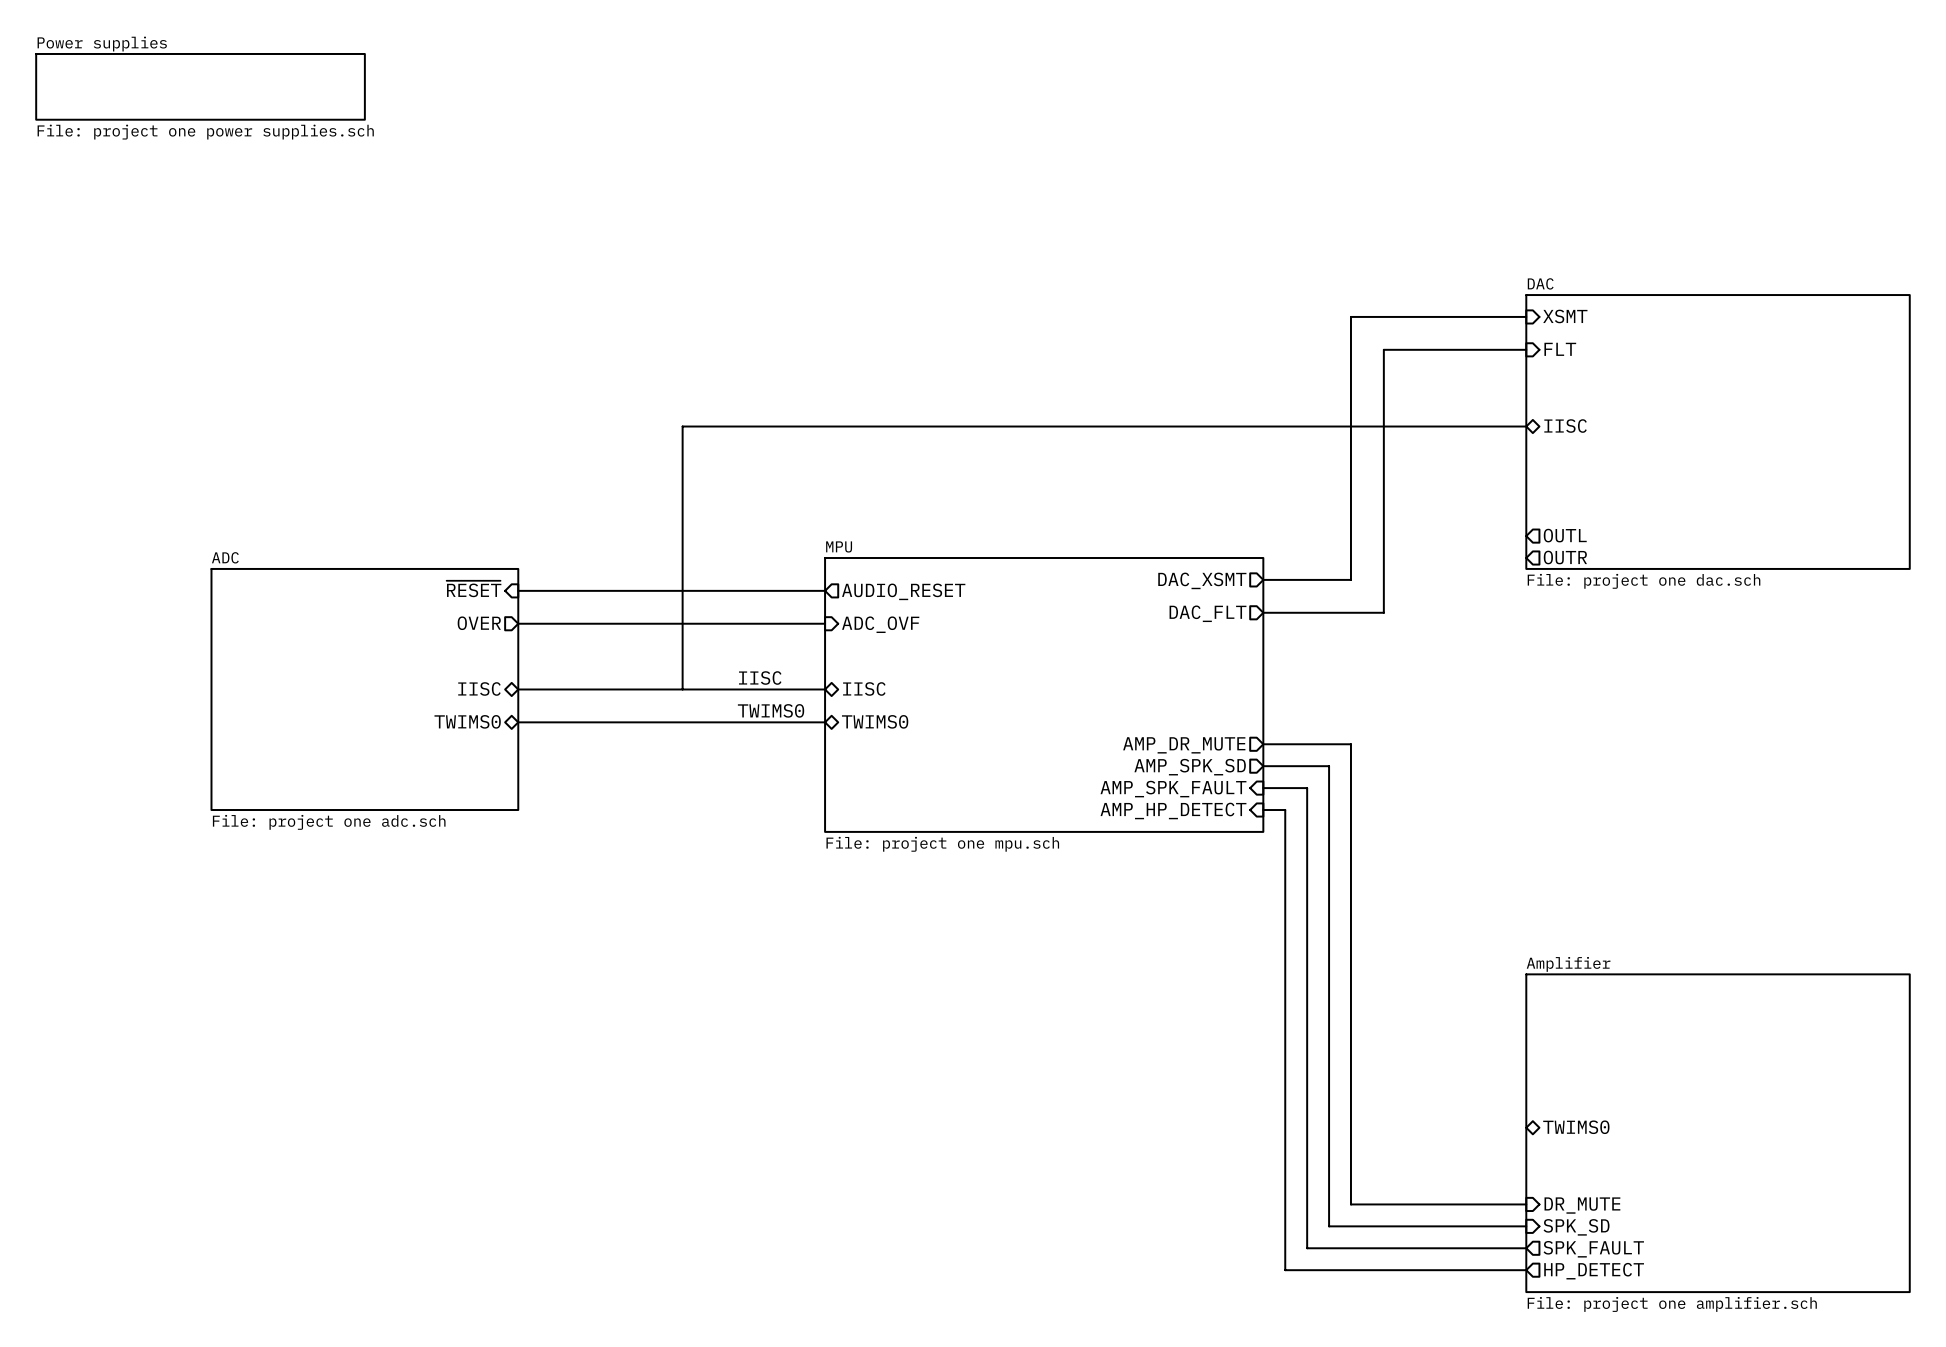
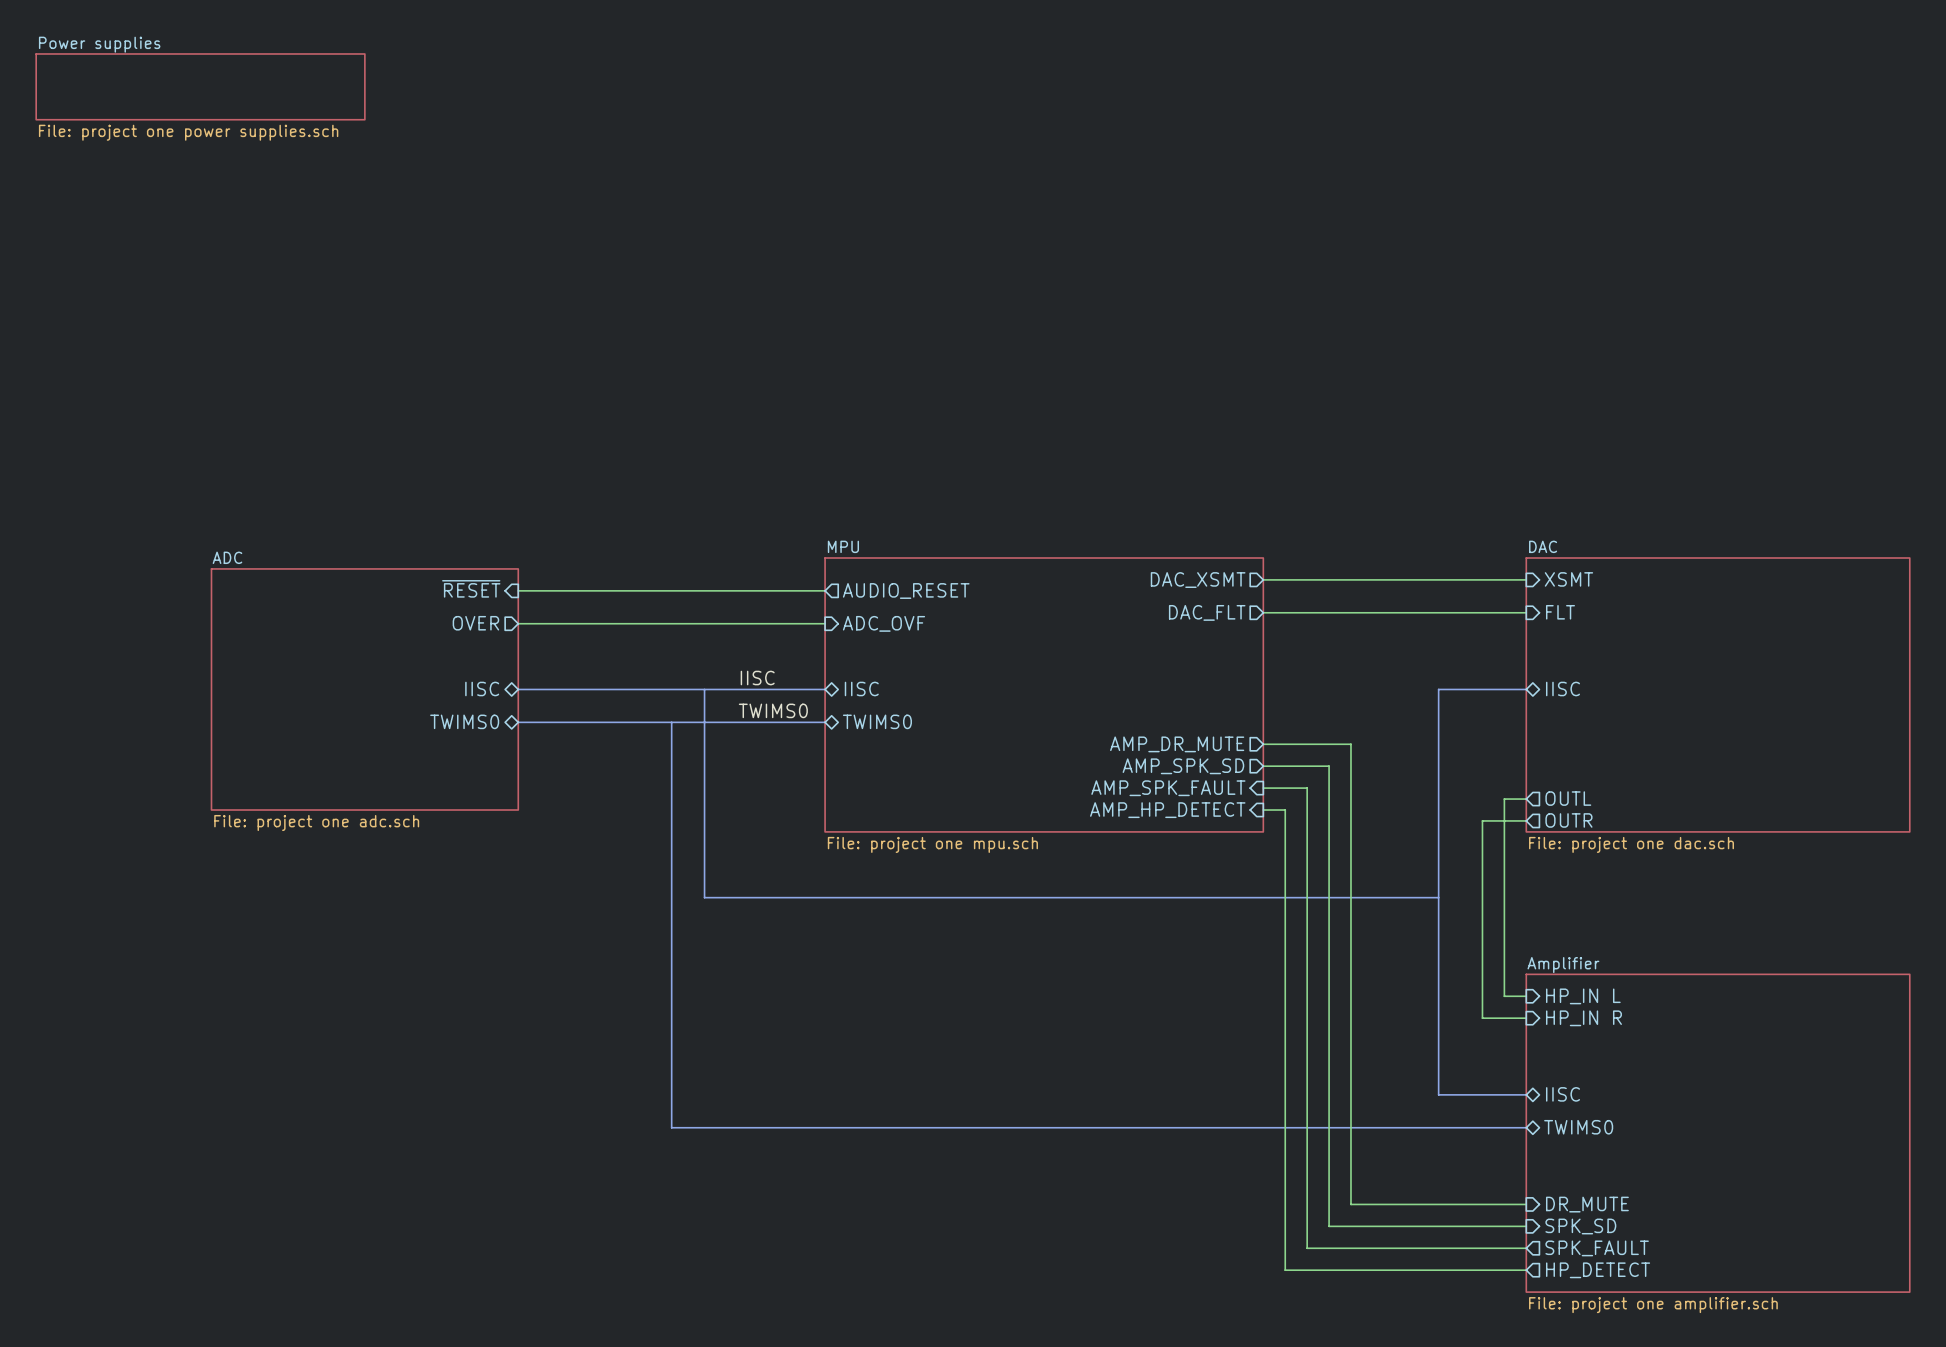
wire: (1526, 316) (1350, 316) (1350, 579) -> (1526, 579) (1350, 579)
sheet pin: XSMT (1565, 316) -> none
wire: (1526, 349) (1383, 349) (1383, 612) -> (1526, 612) (1383, 612)
sheet pin: FLT (1560, 349) -> none
bus: (1526, 426) (682, 426) (682, 689) -> none
sheet pin: IISC (1565, 426) -> none
sheet DAC: File: project one dac.sch (1718, 431) -> none
sheet pin: OUTL (1565, 535) -> none
sheet pin: OUTR (1565, 557) -> none
sheet pin: none -> XSMT (1568, 579)
sheet pin: none -> FLT (1560, 612)
sheet pin: none -> IISC (1563, 688)
bus: none -> (704, 689) (704, 897) (1438, 897)
bus: none -> (1526, 689) (1438, 689) (1438, 1094) (1526, 1094)
sheet DAC: none -> File: project one dac.sch (1718, 694)
bus: none -> (671, 722) (671, 1127) (1526, 1127)
sheet pin: none -> OUTL (1568, 798)
wire: none -> (1526, 799) (1504, 799) (1504, 996) (1526, 996)
wire: none -> (1526, 820) (1482, 820) (1482, 1018) (1526, 1018)
sheet pin: none -> OUTR (1568, 820)
sheet pin: none -> HP_IN L (1583, 996)
sheet pin: none -> HP_IN R (1583, 1018)
sheet pin: none -> IISC (1563, 1094)

